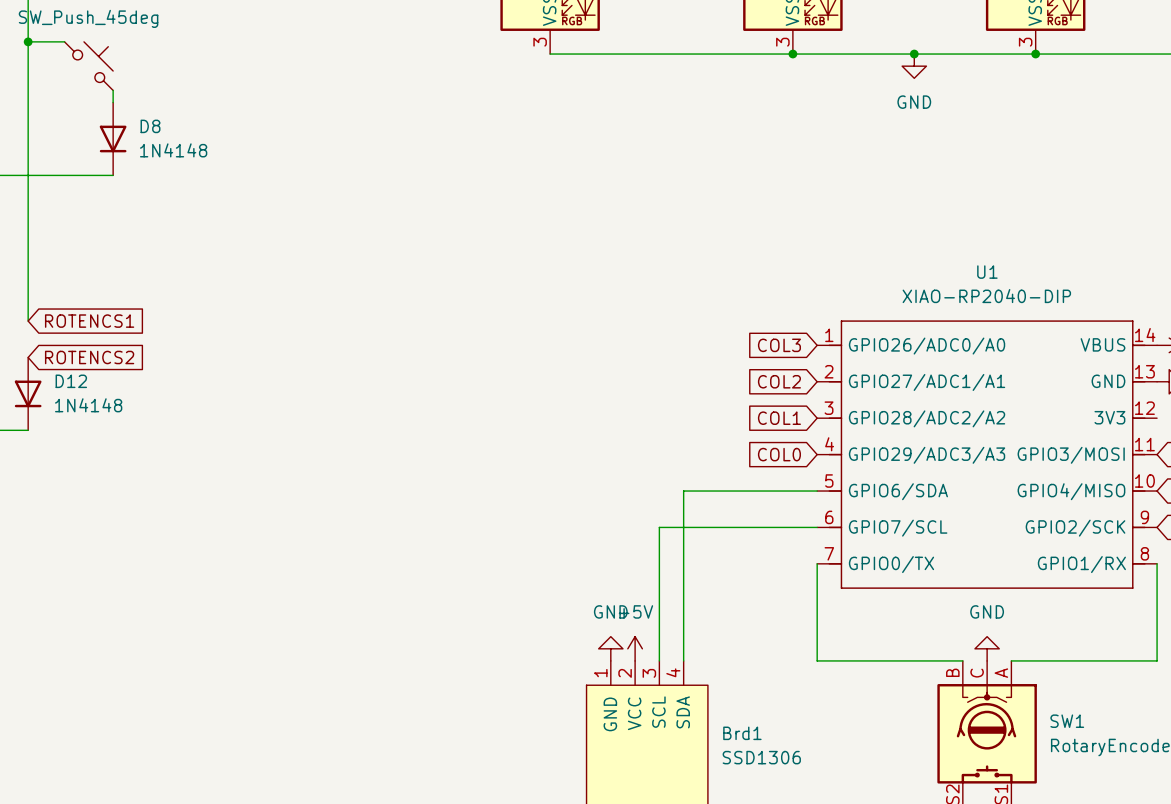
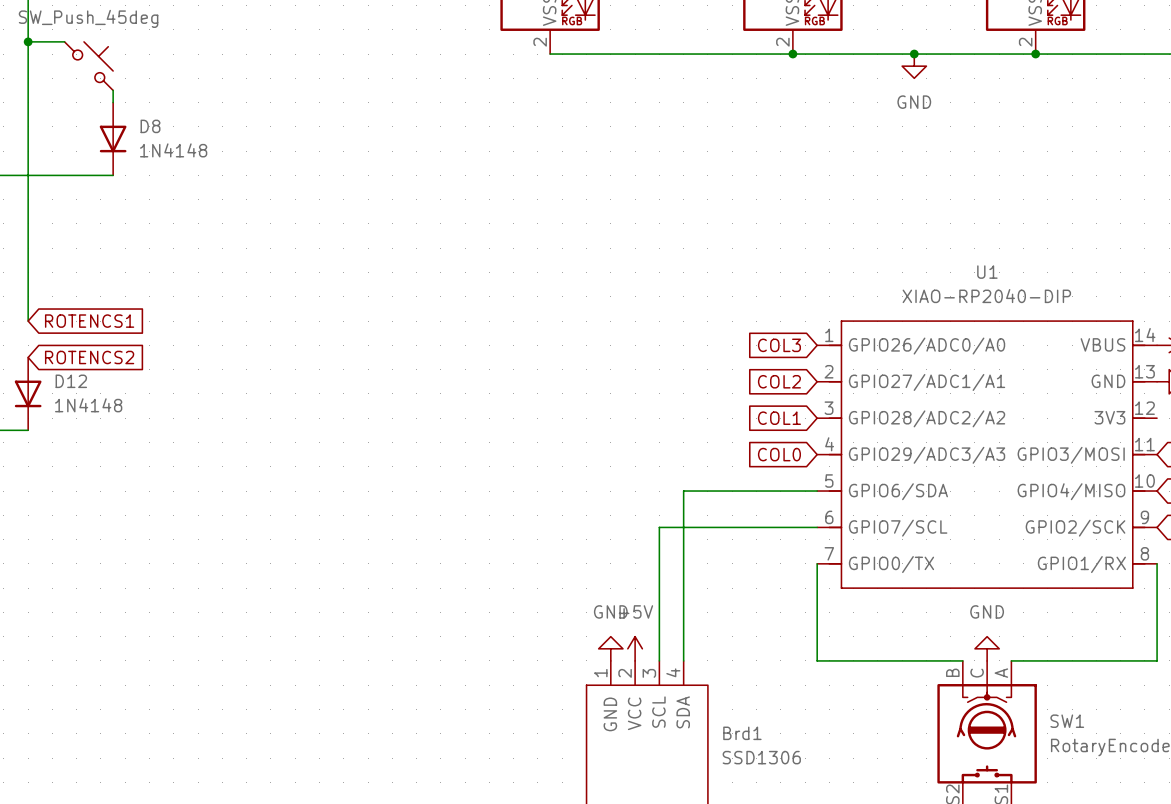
part pin number: 3 (540, 42) -> 2 (540, 42)
part pin number: 3 (782, 42) -> 2 (782, 42)
part pin number: 3 (1025, 42) -> 2 (1025, 42)

